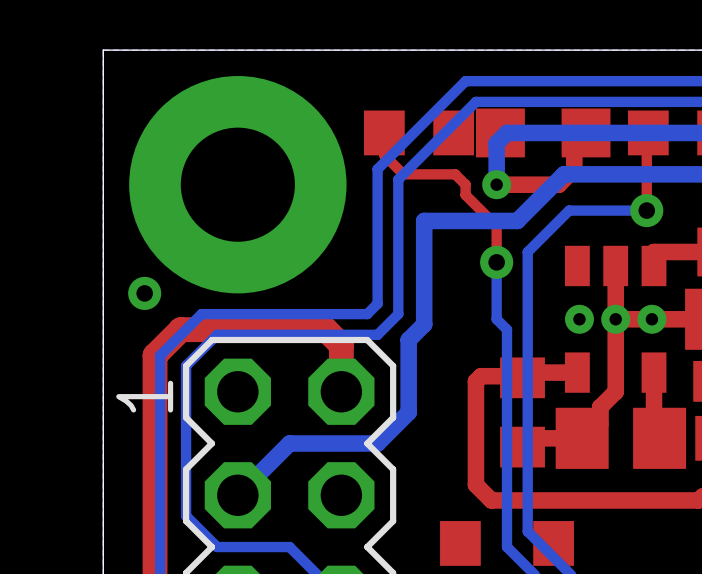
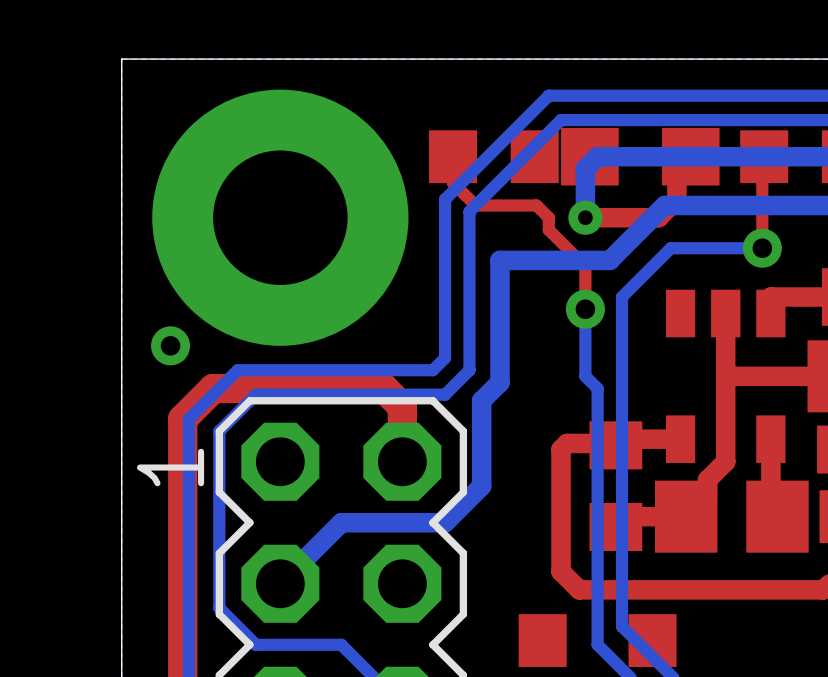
via: (579, 319) -> none
via: (615, 319) -> none
via: (651, 319) -> none

